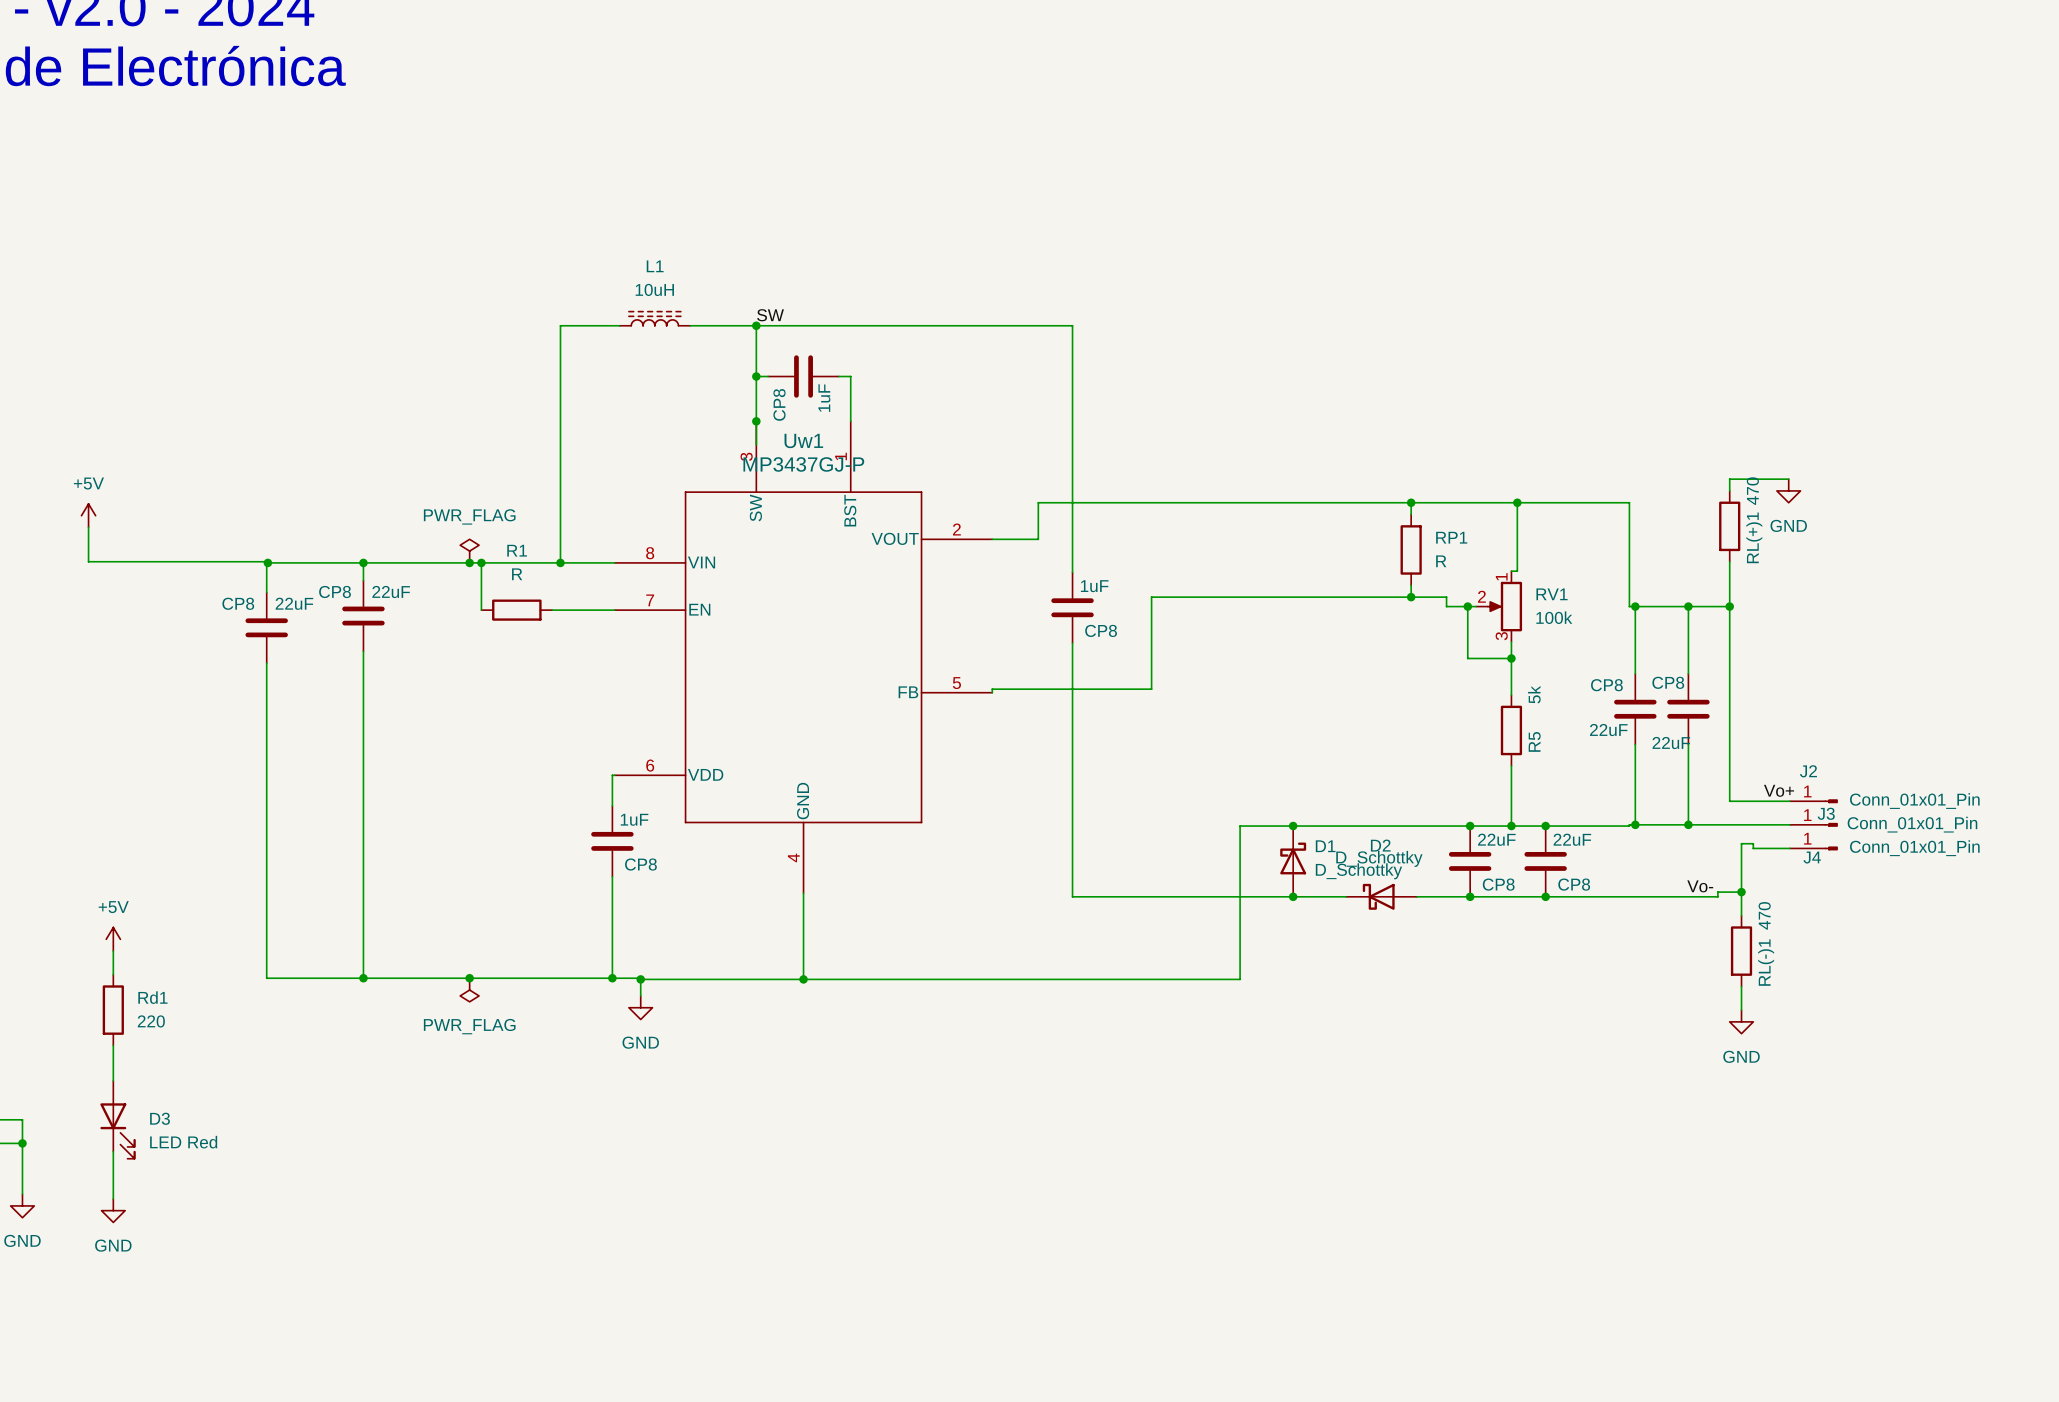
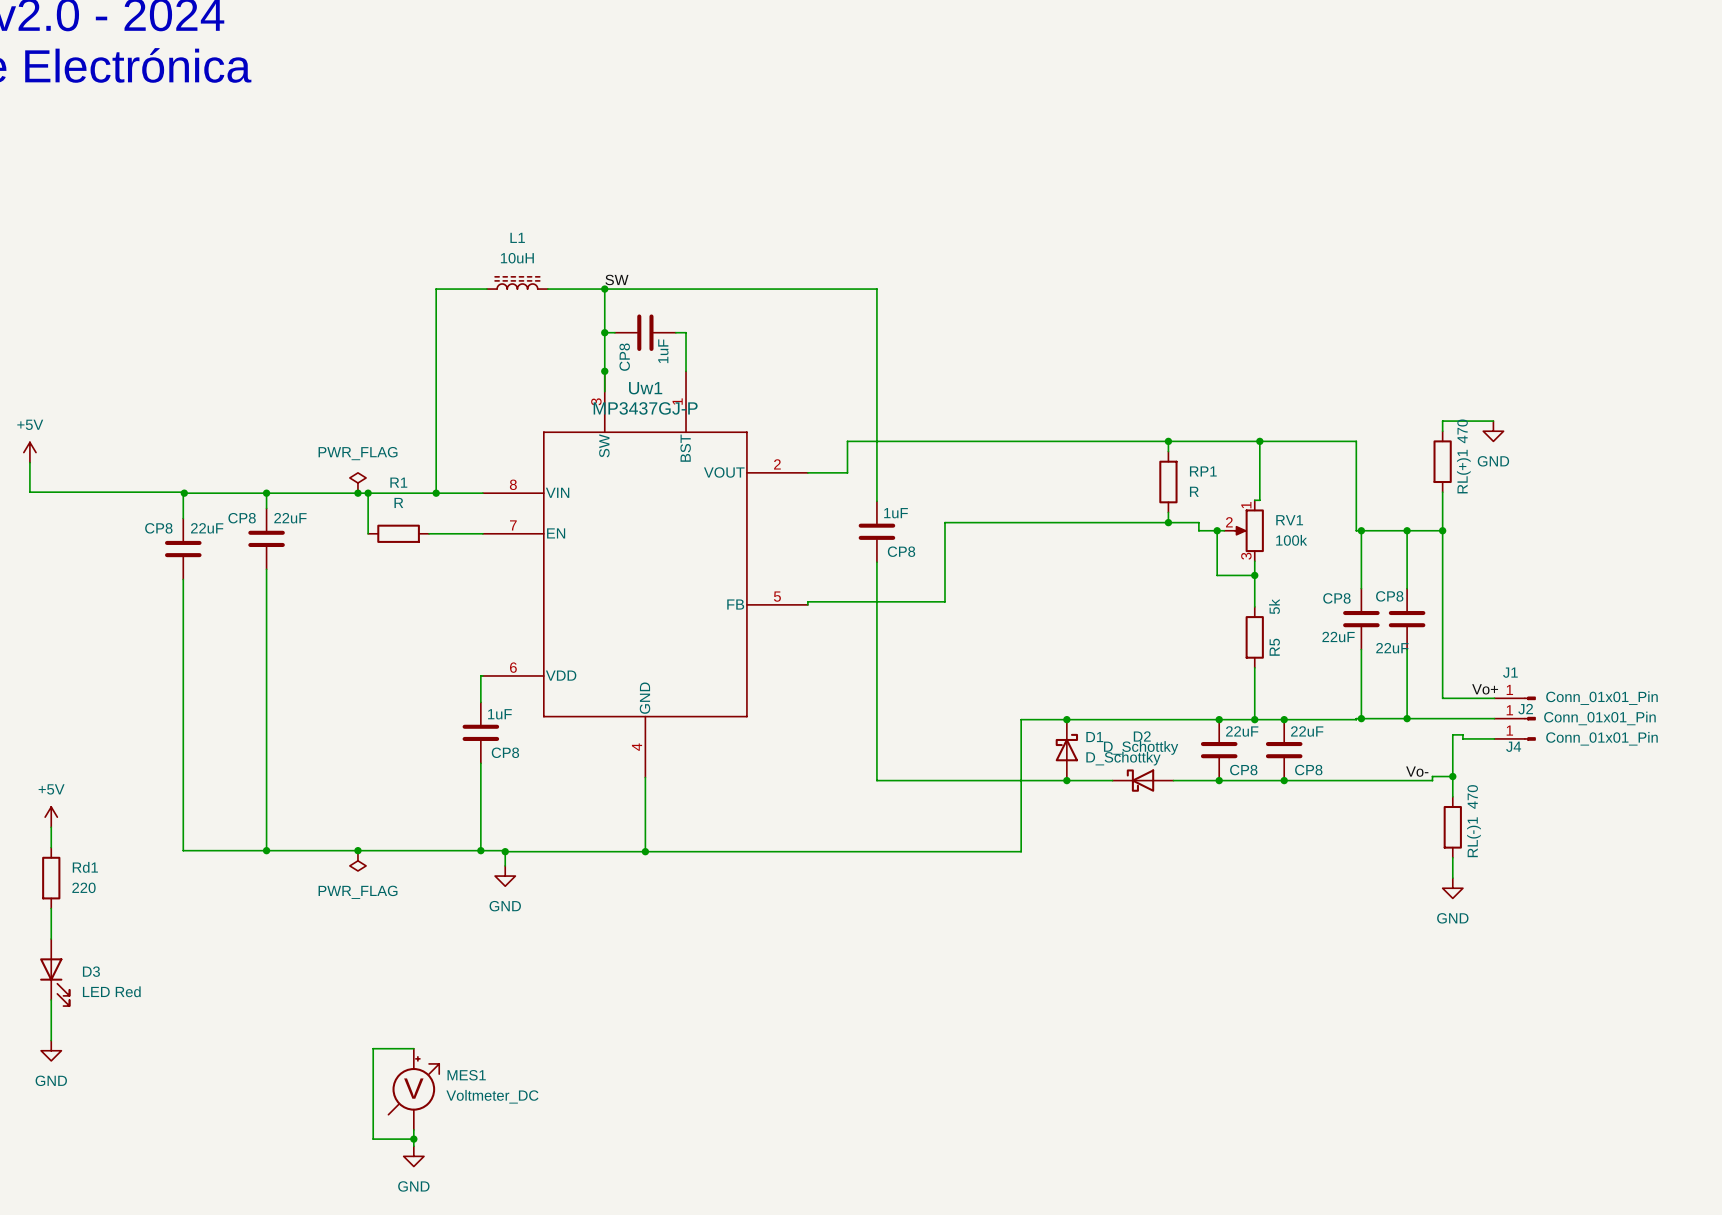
J2 name: J2 (1808, 771) -> J1 (1510, 672)
J3 name: J3 (1826, 813) -> J2 (1525, 709)
wire: none -> (413, 1048) (373, 1048) (373, 1139) (413, 1139)
MES1: none -> Voltmeter_DC (413, 1089)
wire: none -> (413, 1129) (413, 1146)
junction: none -> (413, 1139)
power symbol: none -> GND (413, 1156)

